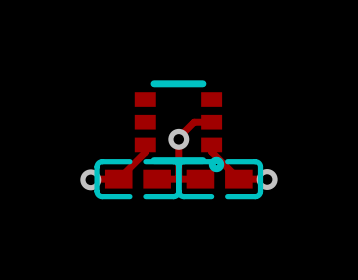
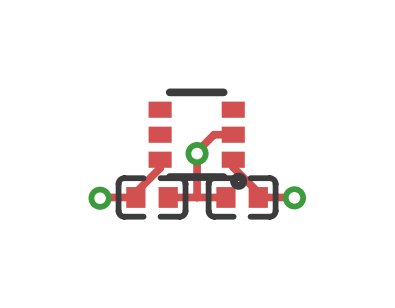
part footprint: [94, 159, 182, 200] -> [115, 175, 189, 220]
part footprint: [176, 159, 264, 200] -> [205, 175, 279, 220]

